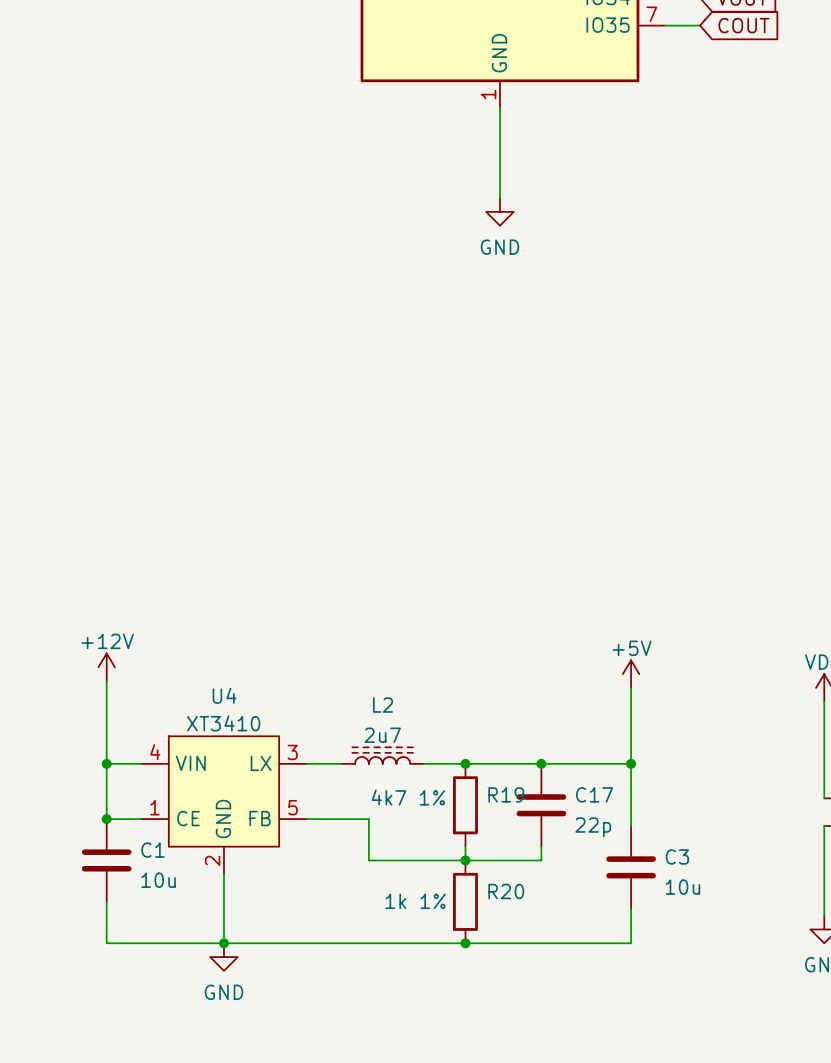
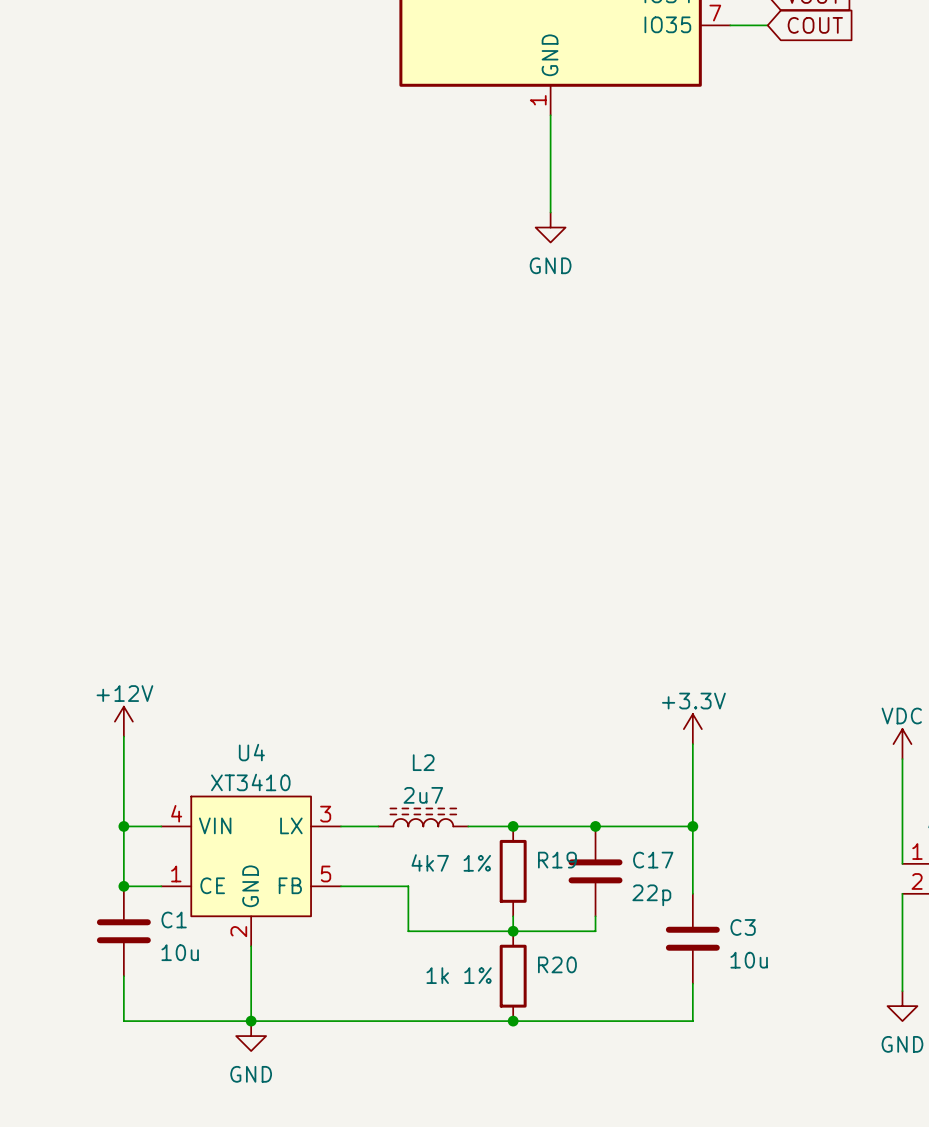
power symbol: +5V (631, 674) -> +3.3V (692, 729)

